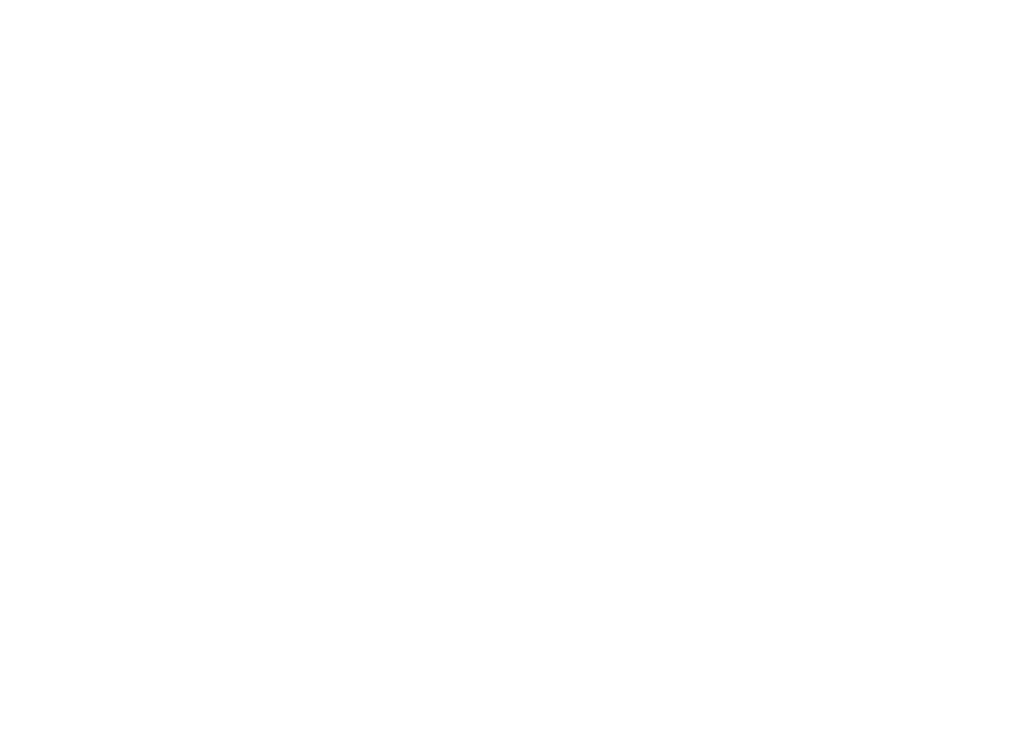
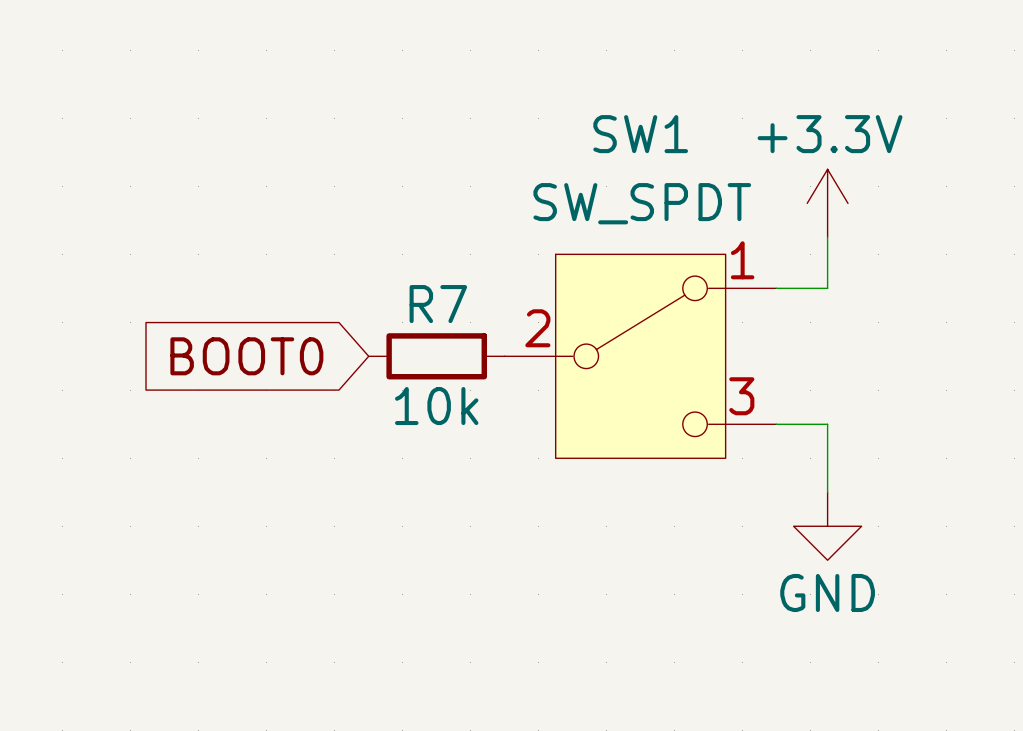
power symbol: none -> +3.3V (827, 203)
wire: none -> (827, 237) (827, 288) (776, 288)
global label: none -> BOOT0 (246, 356)
R7: none -> 10k (436, 356)
SW1: none -> SW_SPDT (640, 356)
wire: none -> (776, 424) (827, 424) (827, 492)
power symbol: none -> GND (827, 526)

